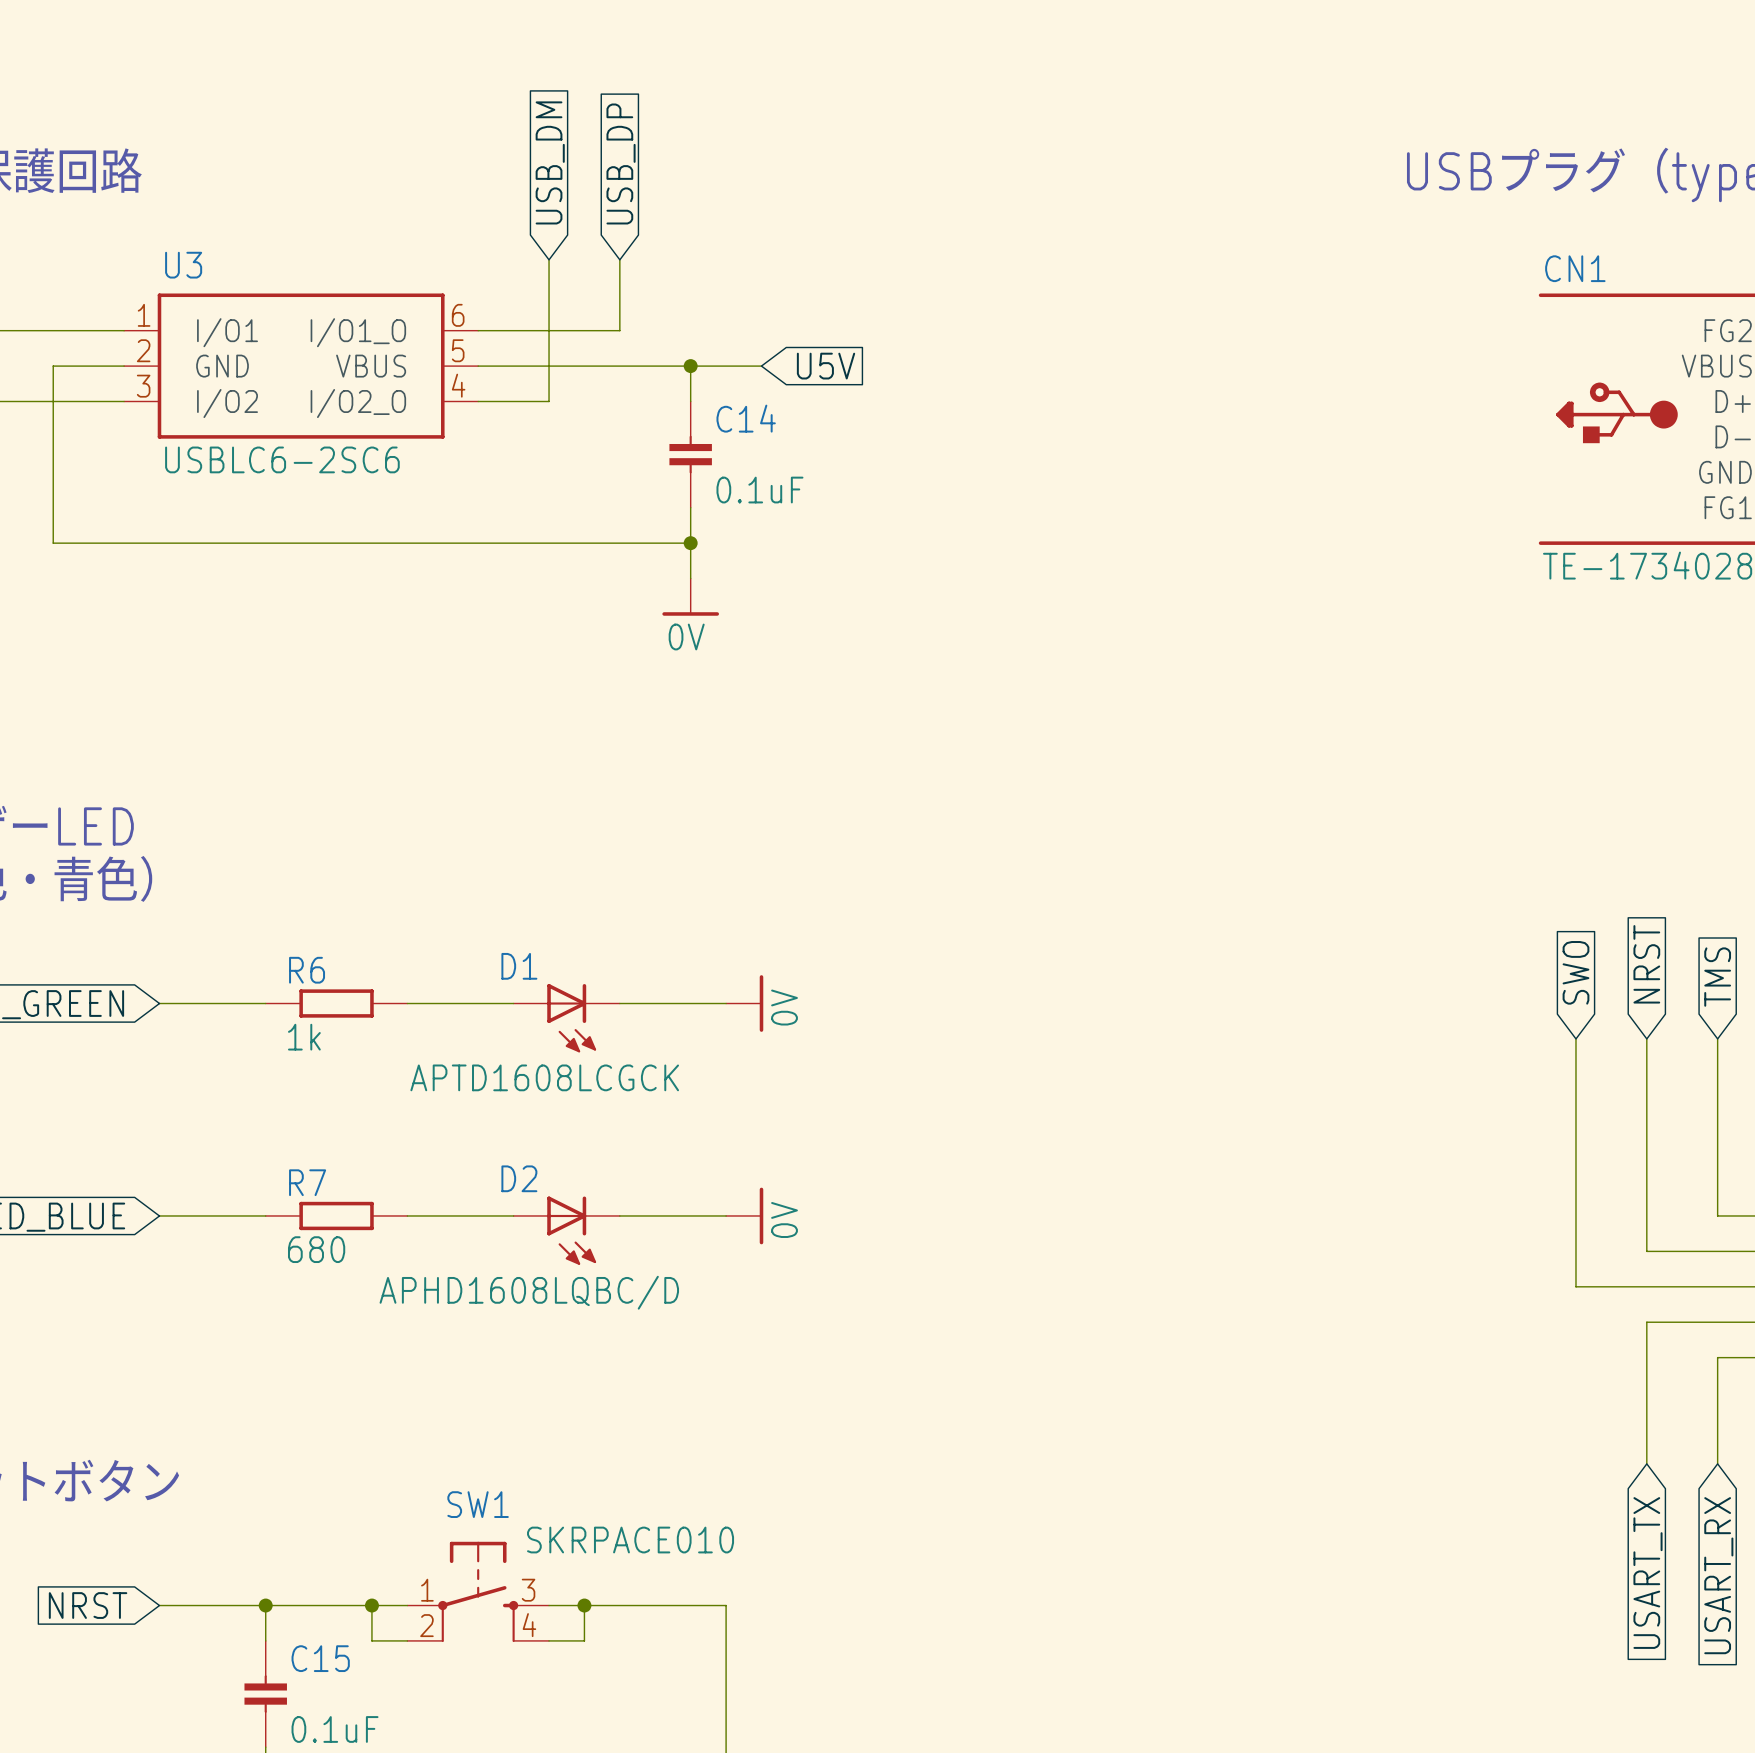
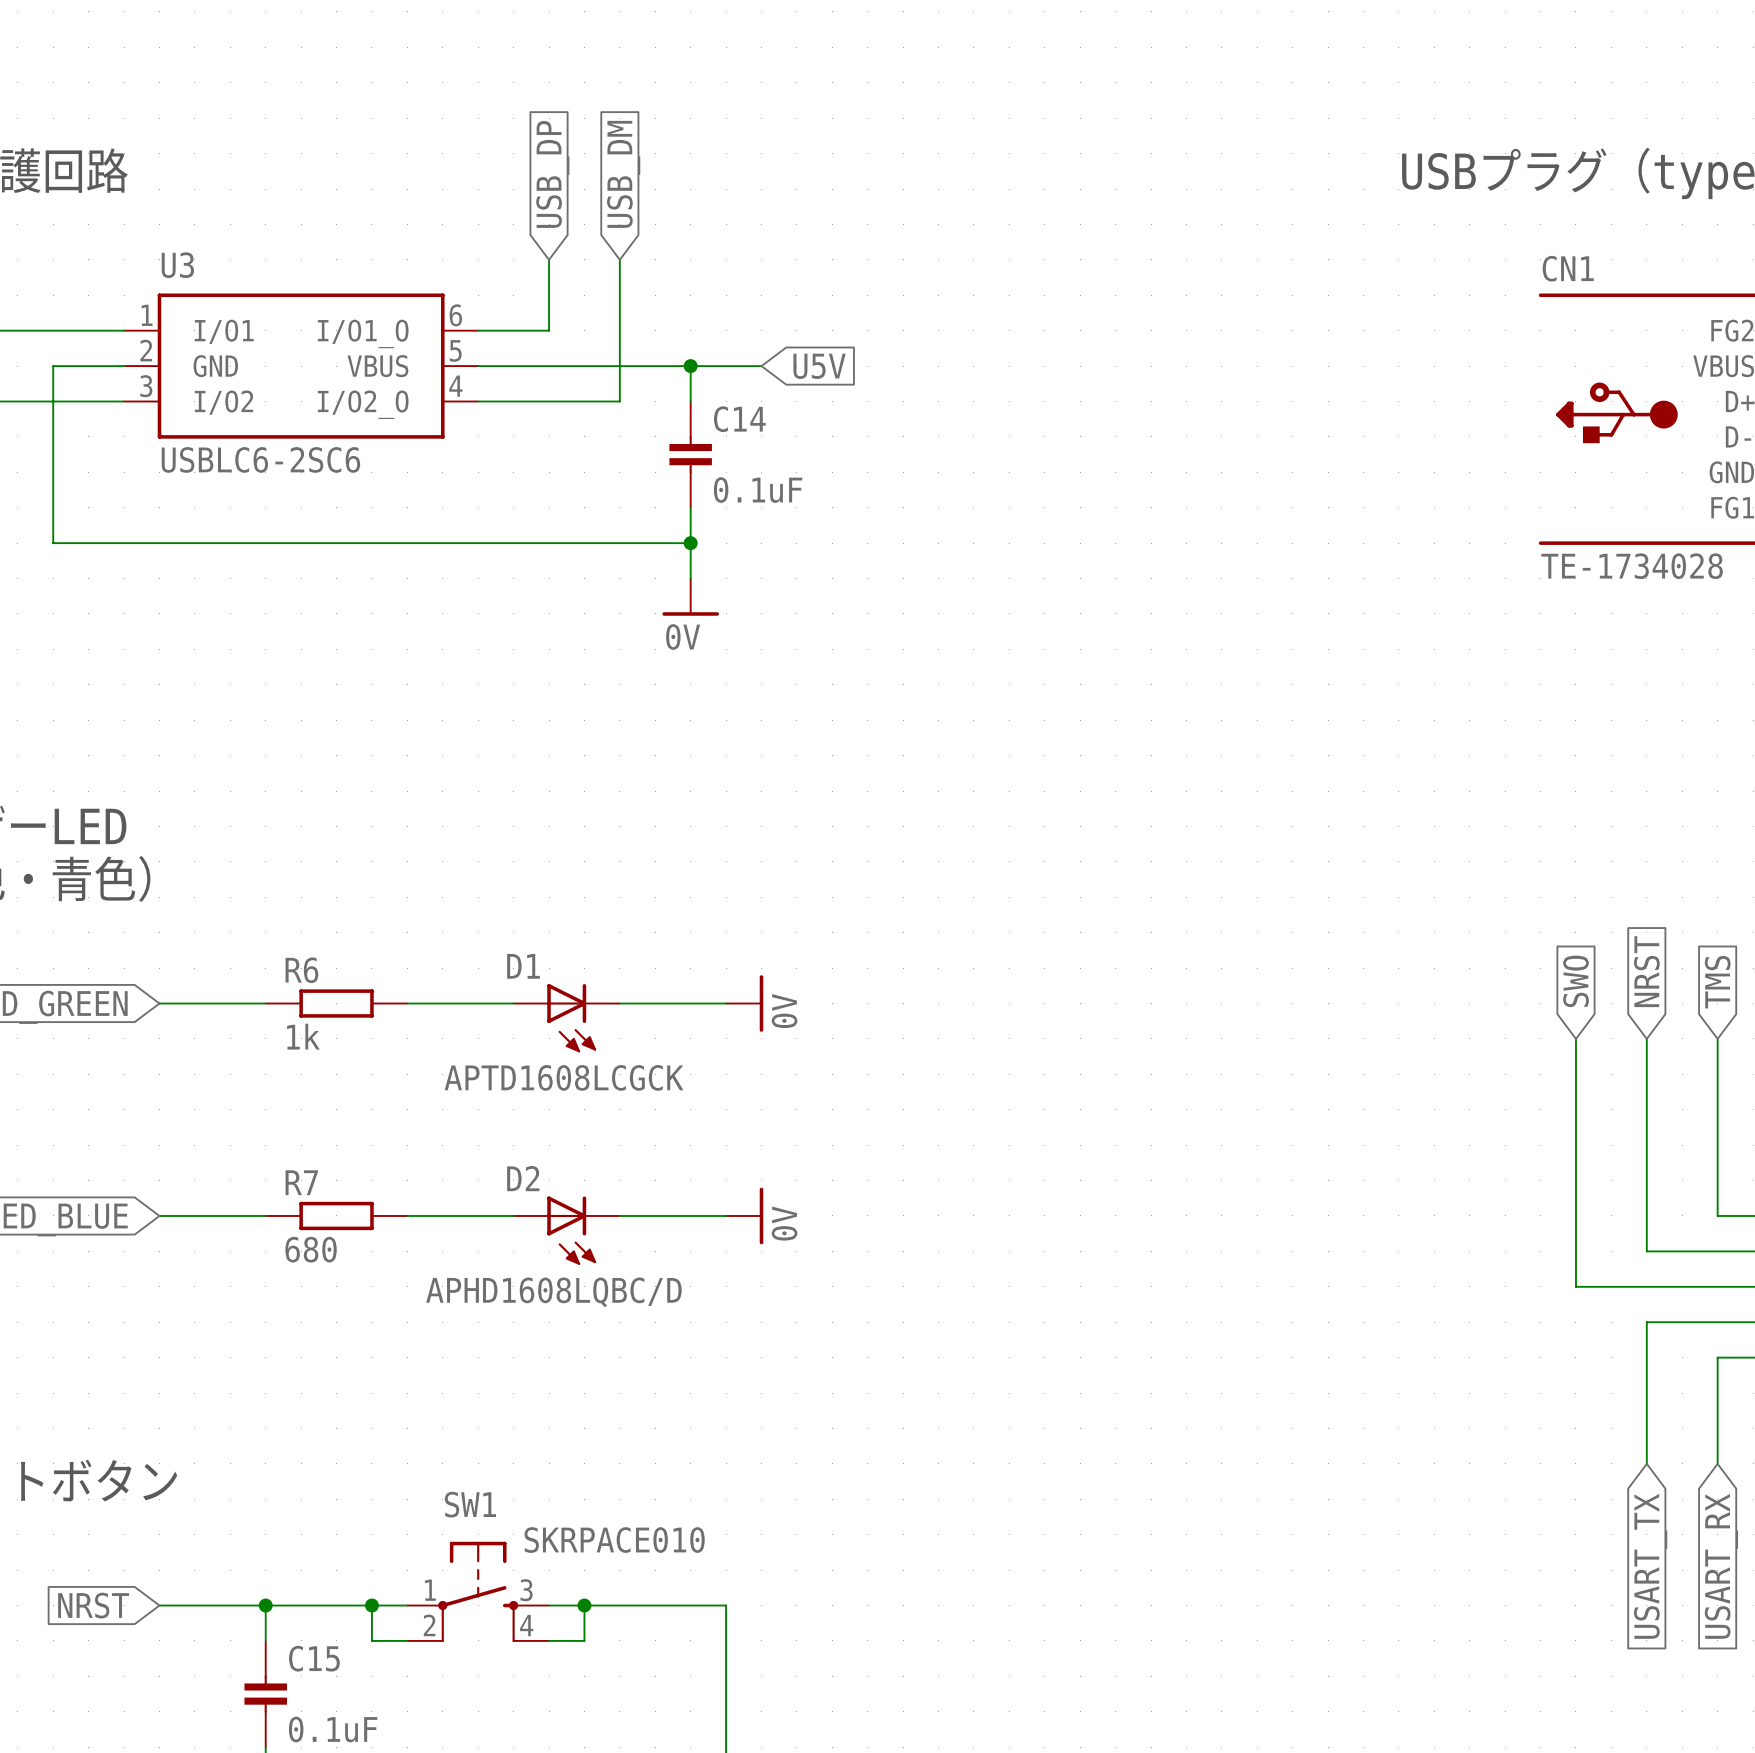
global label: USB_DM (550, 162) -> USB_DP (552, 174)
global label: USB_DP (621, 163) -> USB_DM (623, 174)
wire: (619, 330) (549, 330) (549, 401) -> (619, 330) (619, 401) (549, 401)

